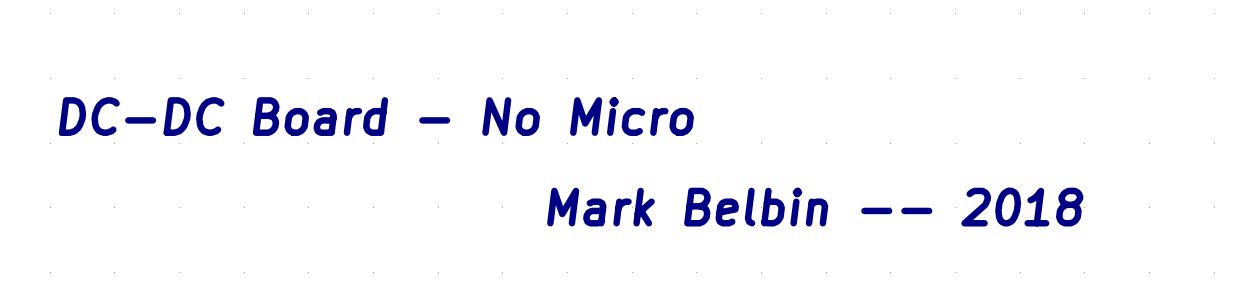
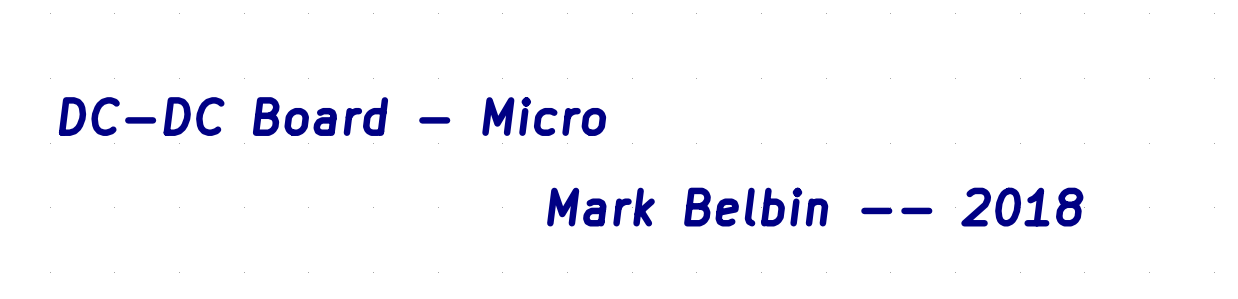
text: DC-DC Board - No Micro (376, 116) -> DC-DC Board - Micro (332, 116)

